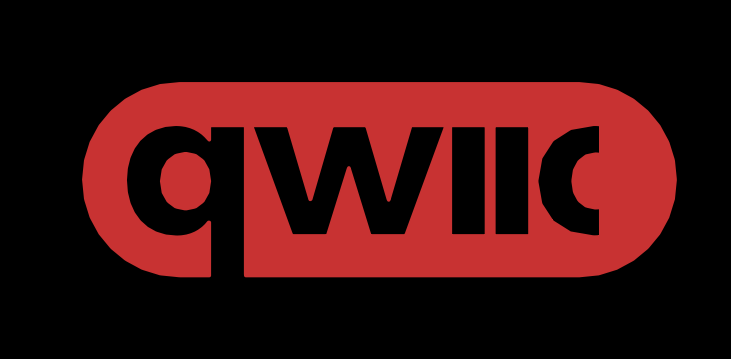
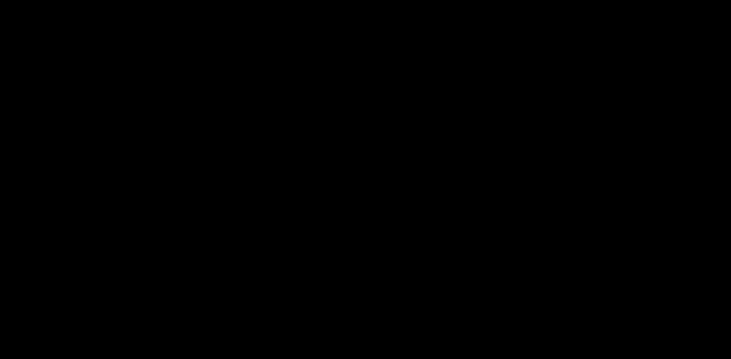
part: (379, 179) -> none

